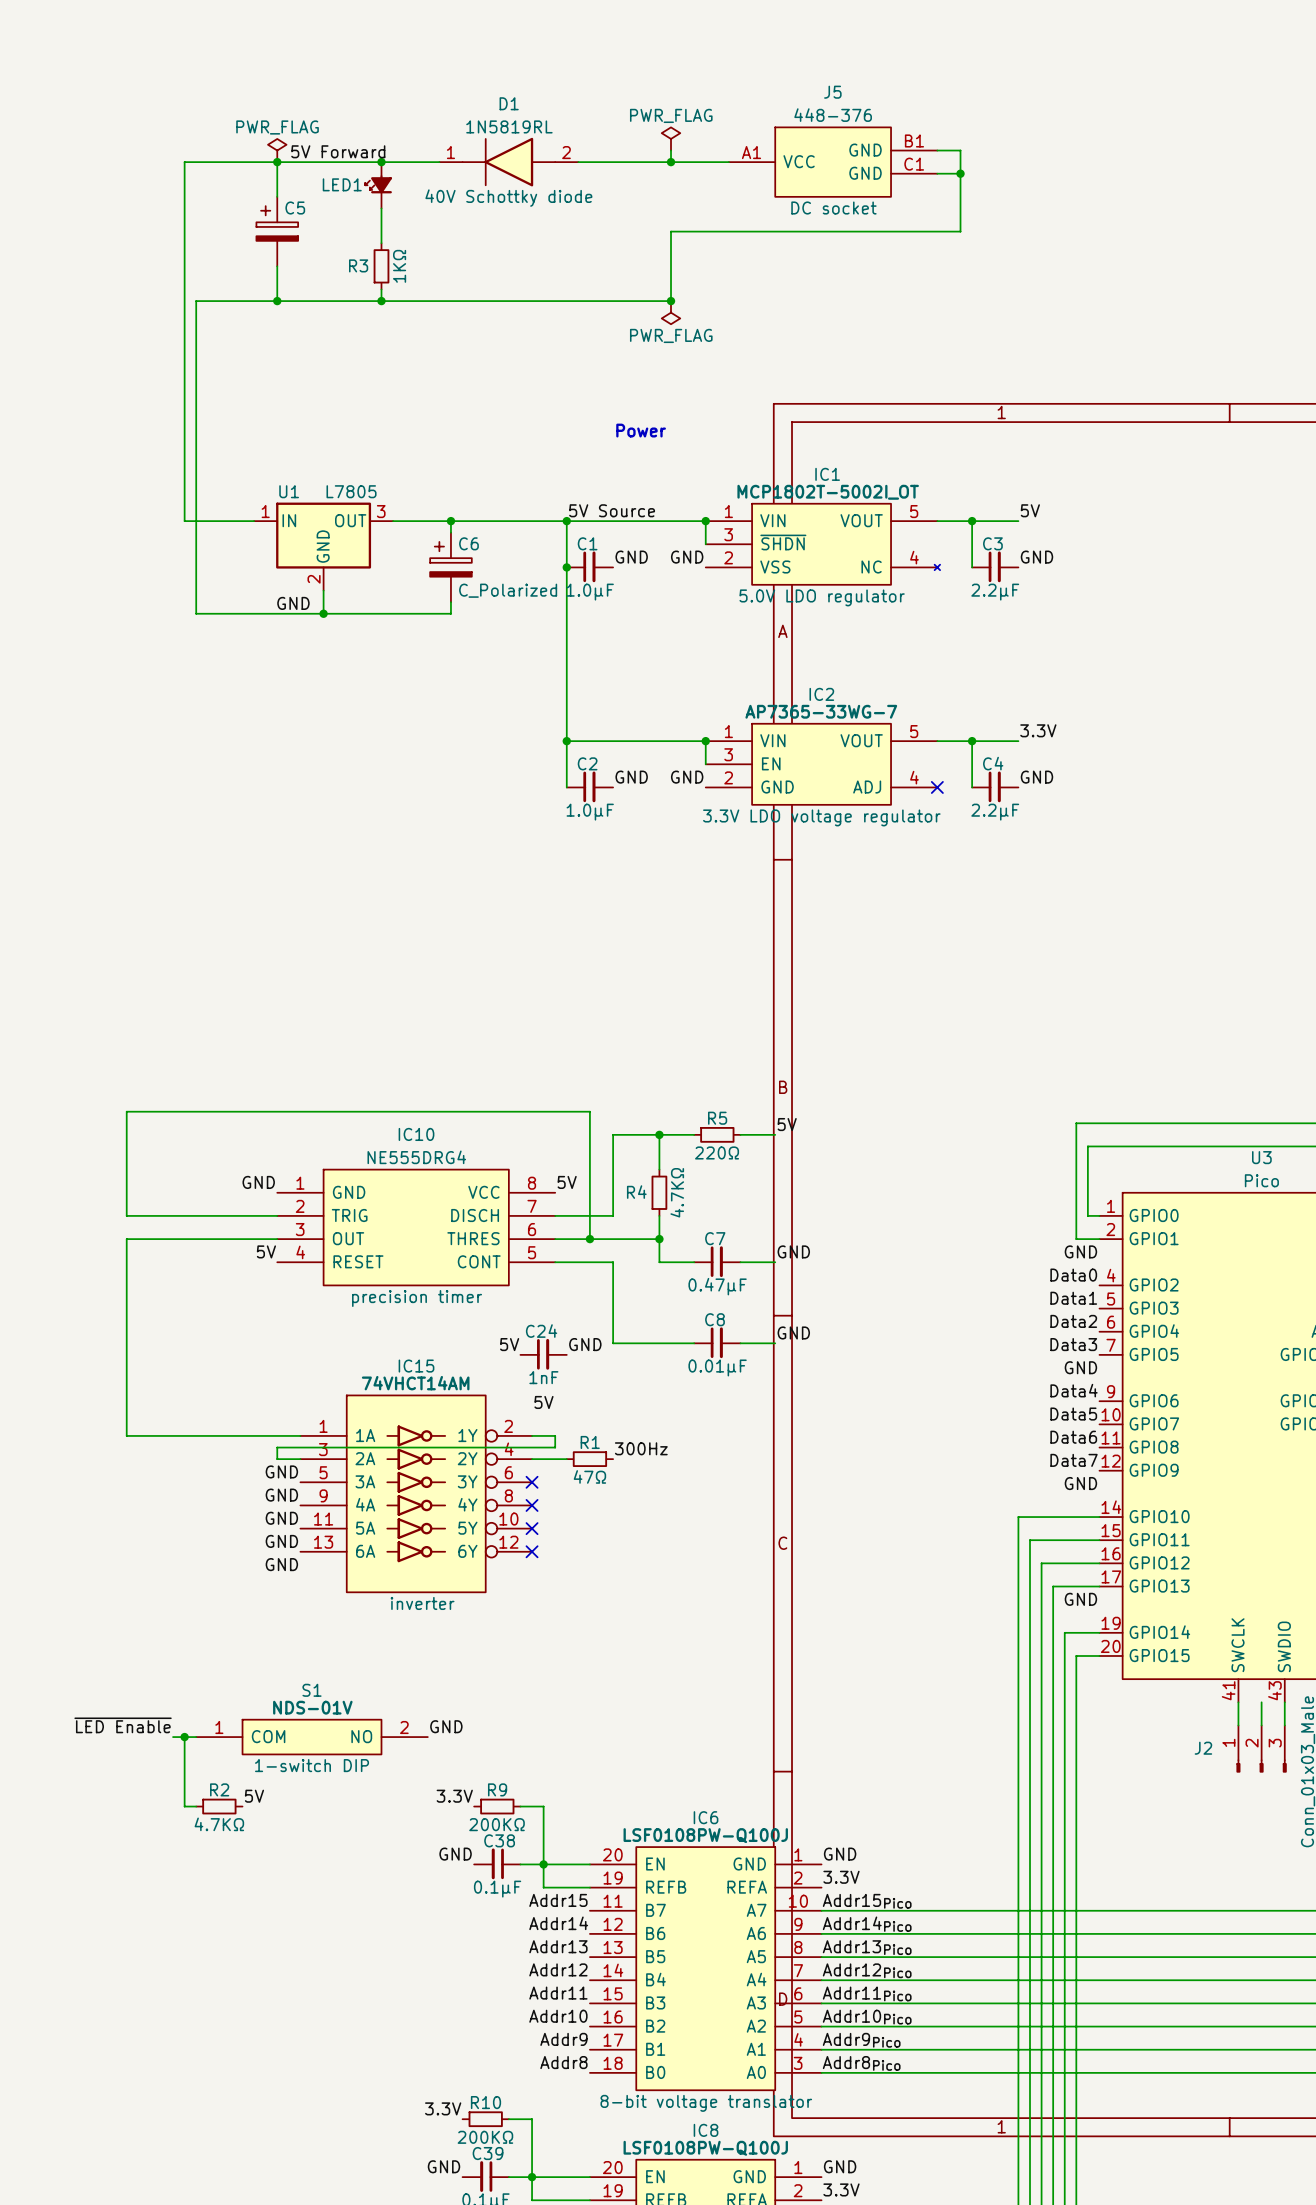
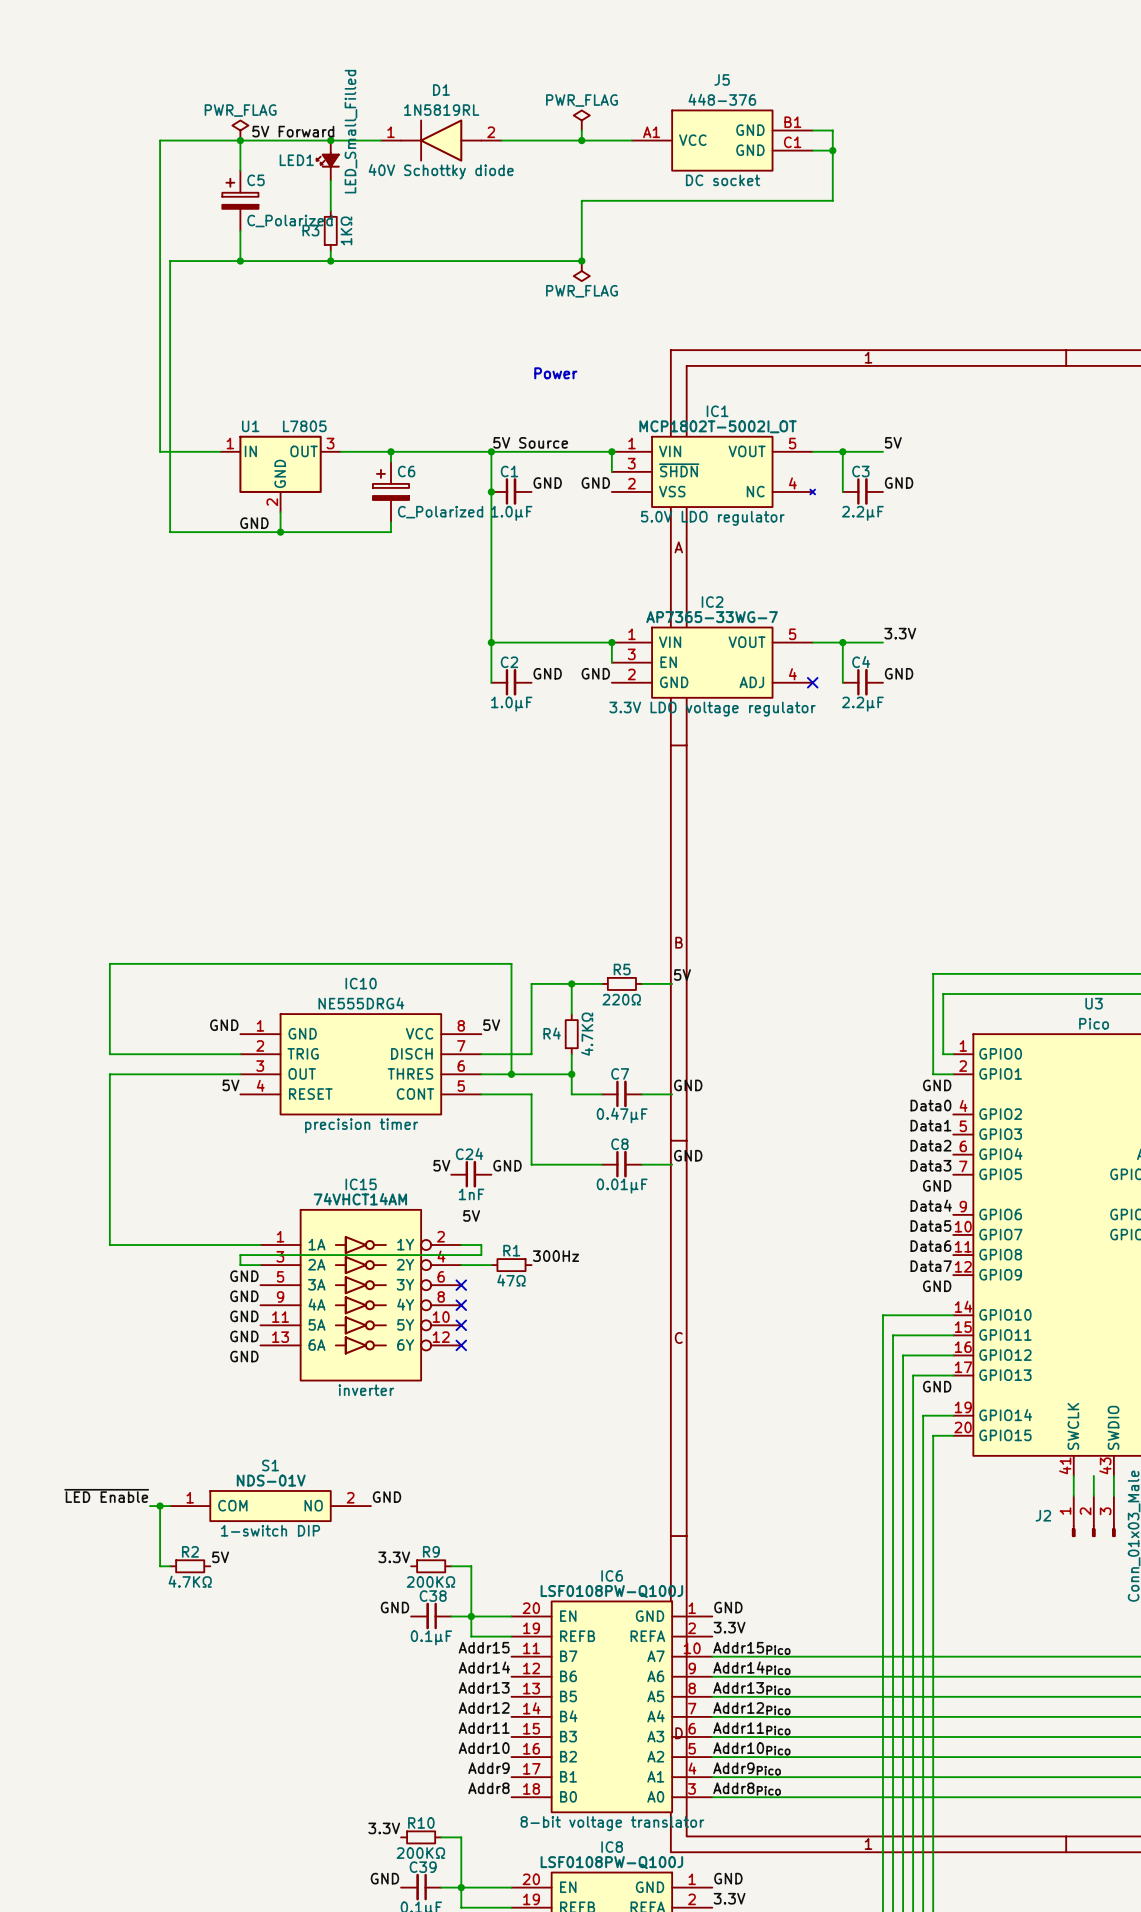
LED1 value: none -> LED_Small_Filled (350, 131)
C5 value: none -> C_Polarized (289, 220)

